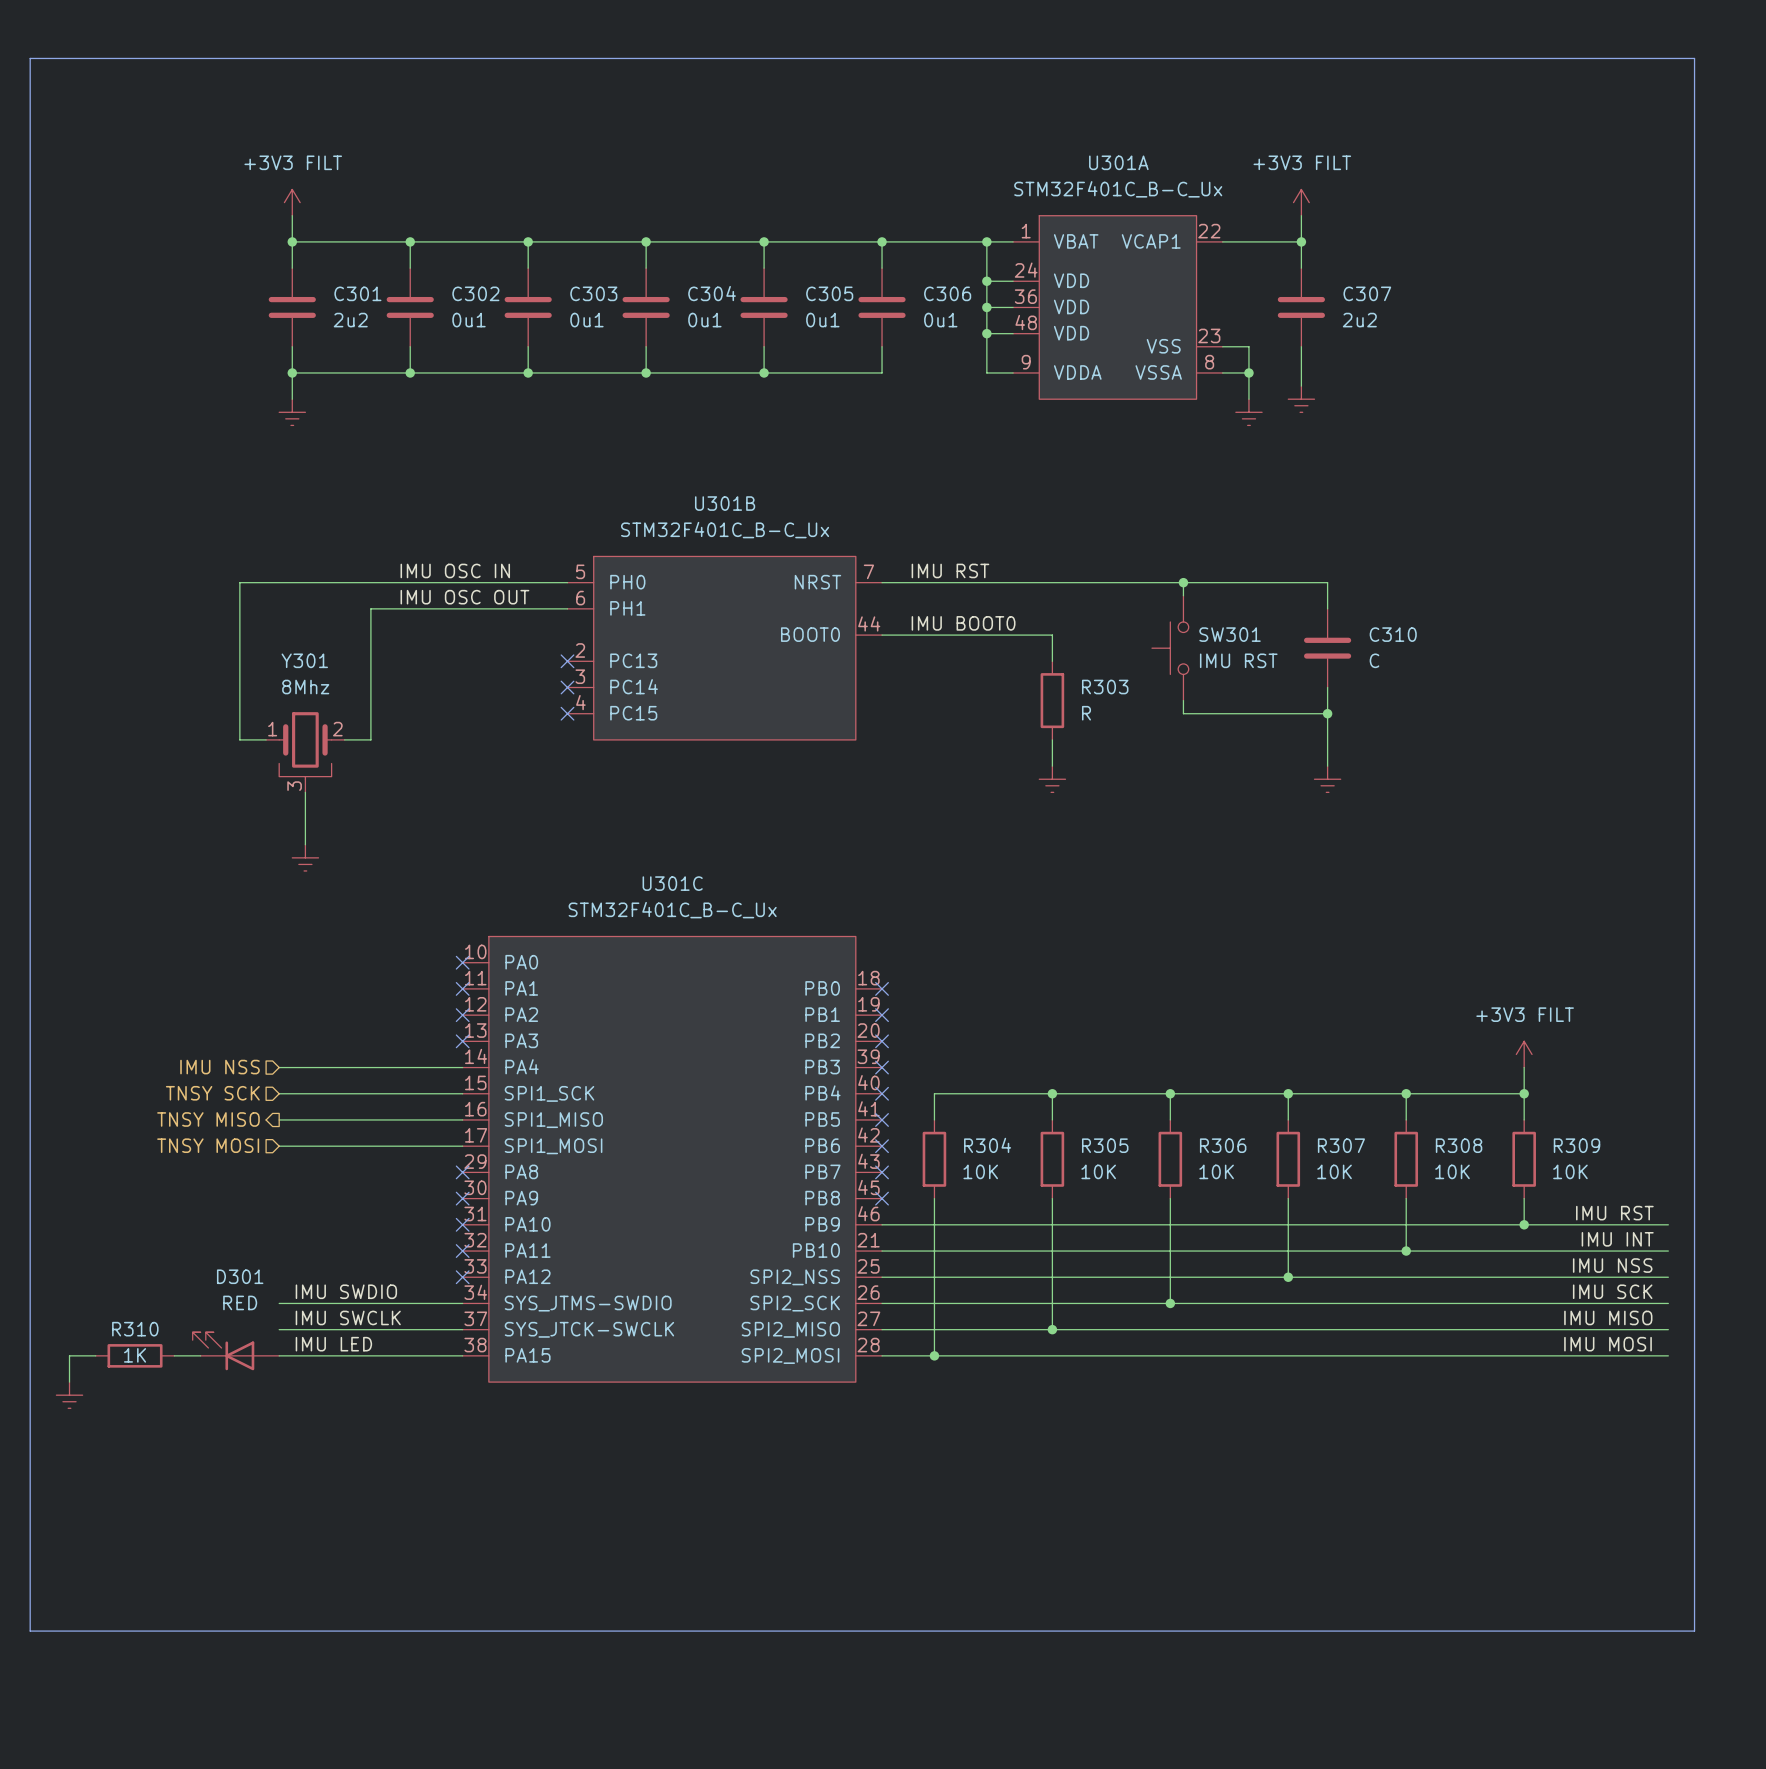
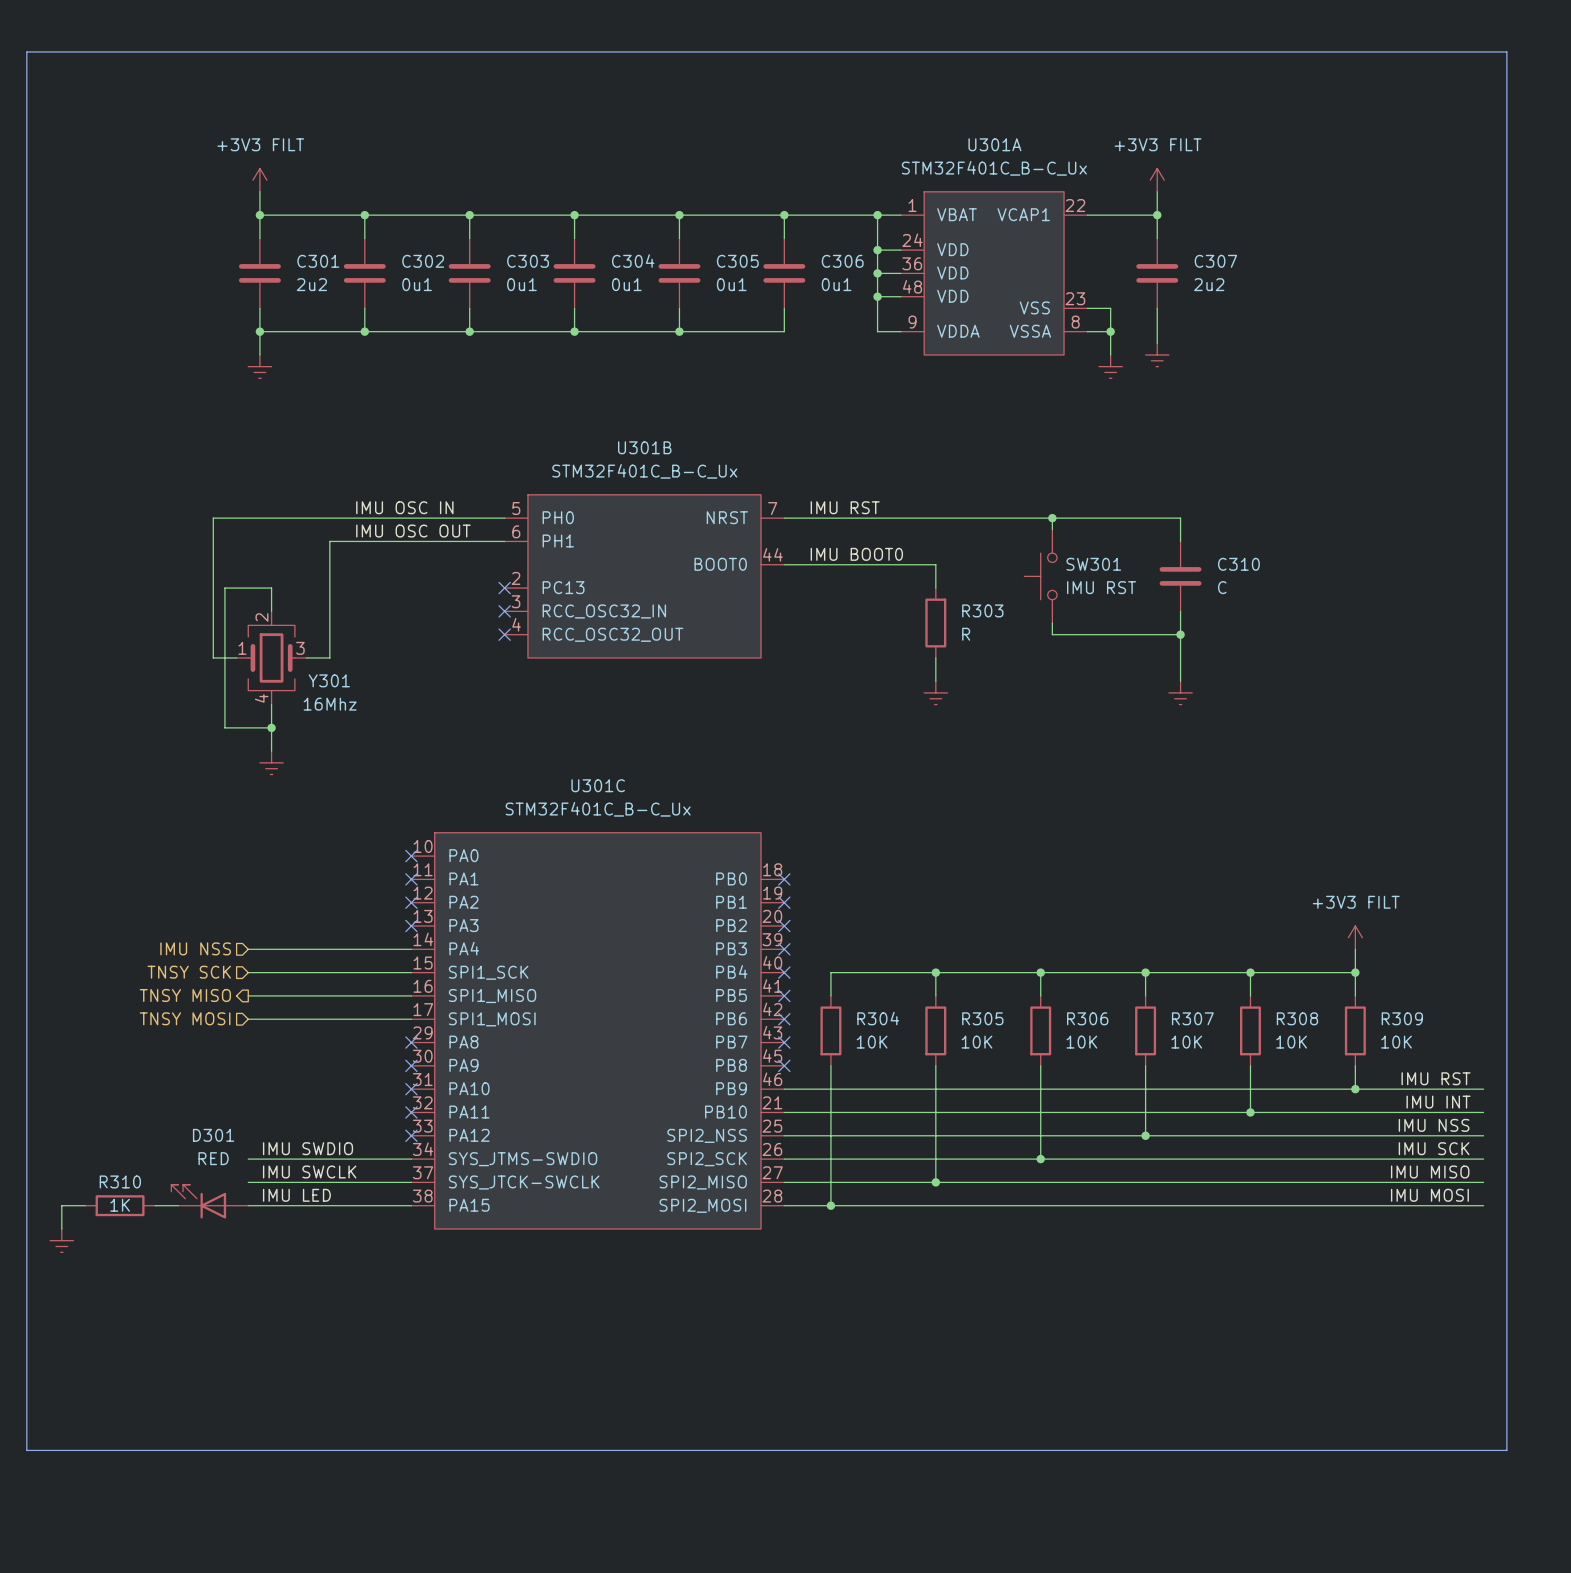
Y301 name position: Y301 (304, 660) -> Y301 (329, 680)
U301B pin name: PC14 (634, 686) -> RCC_OSC32_IN (604, 611)
wire: none -> (271, 611) (271, 588) (224, 588) (224, 727) (271, 727)
Y301 value: 8Mhz (305, 687) -> 16Mhz (330, 704)
Y301 symbol: [266, 712, 345, 793] -> [236, 611, 307, 705]
U301B pin name: PC15 (633, 713) -> RCC_OSC32_OUT (612, 634)
junction: none -> (271, 727)

